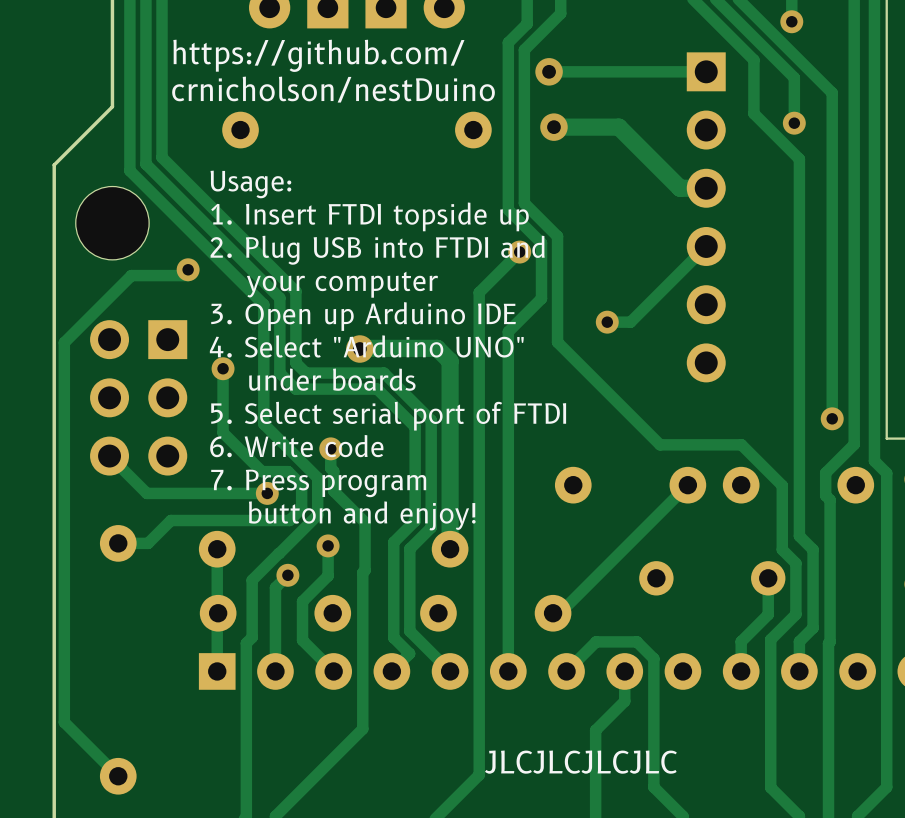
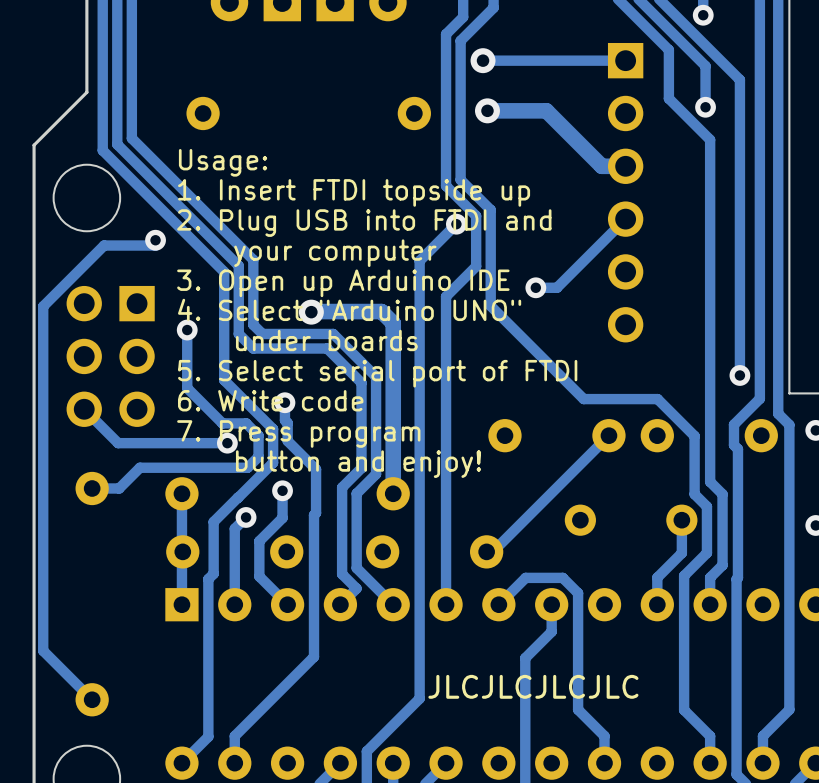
text: https://github.com/ (318, 55) -> none
text: crnicholson/nestDuino (333, 89) -> none

